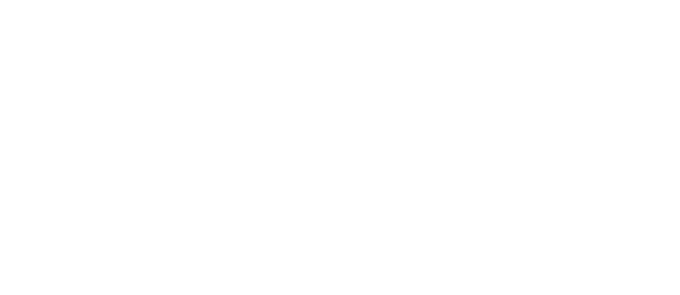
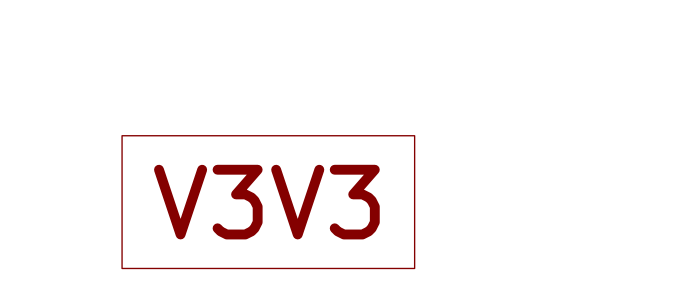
global label: none -> V3V3 (266, 202)

